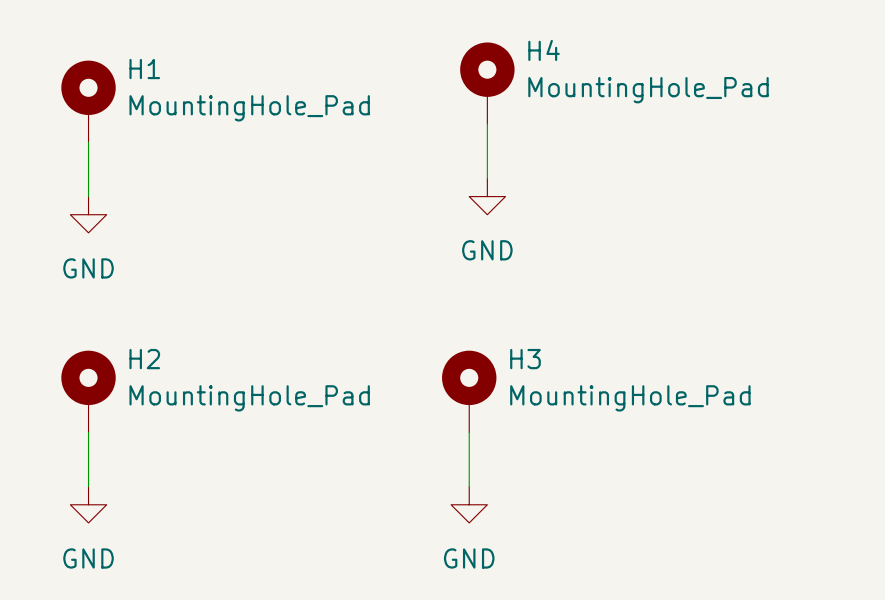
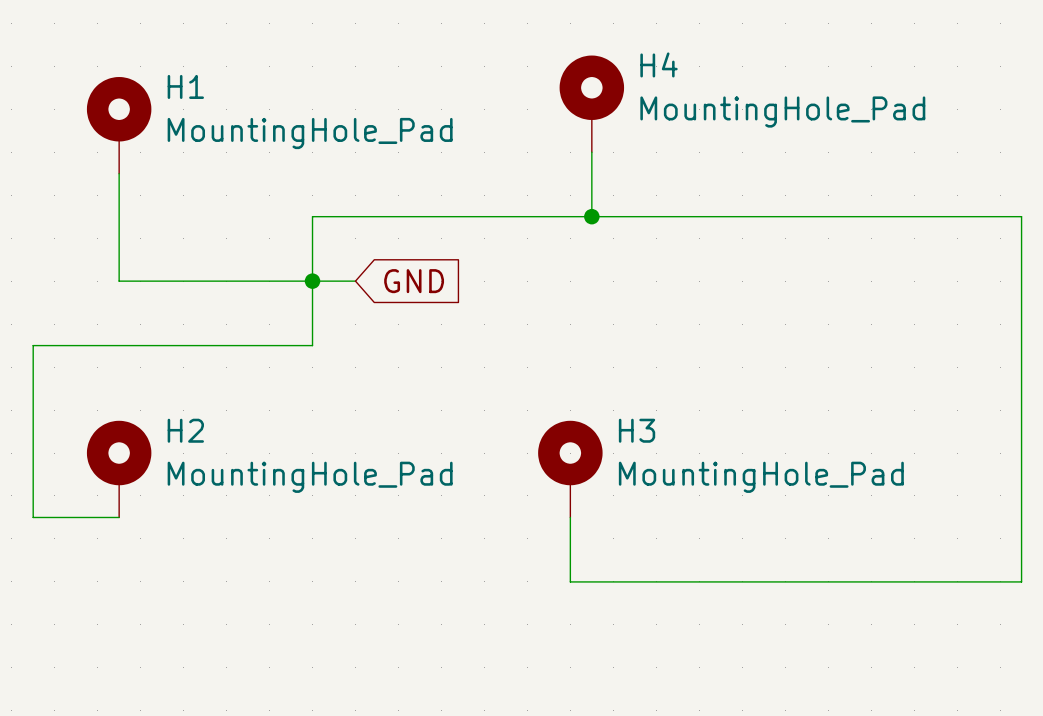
junction: none -> (591, 216)
wire: none -> (119, 238) (119, 281) (355, 281)
power symbol: GND (487, 196) -> none
power symbol: GND (88, 214) -> none
junction: none -> (312, 281)
global label: none -> GND (414, 281)
wire: (88, 432) (88, 486) -> (119, 517) (33, 517) (33, 345) (312, 345) (312, 216) (1021, 216) (1021, 581) (570, 581)
power symbol: GND (88, 504) -> none
power symbol: GND (469, 504) -> none

